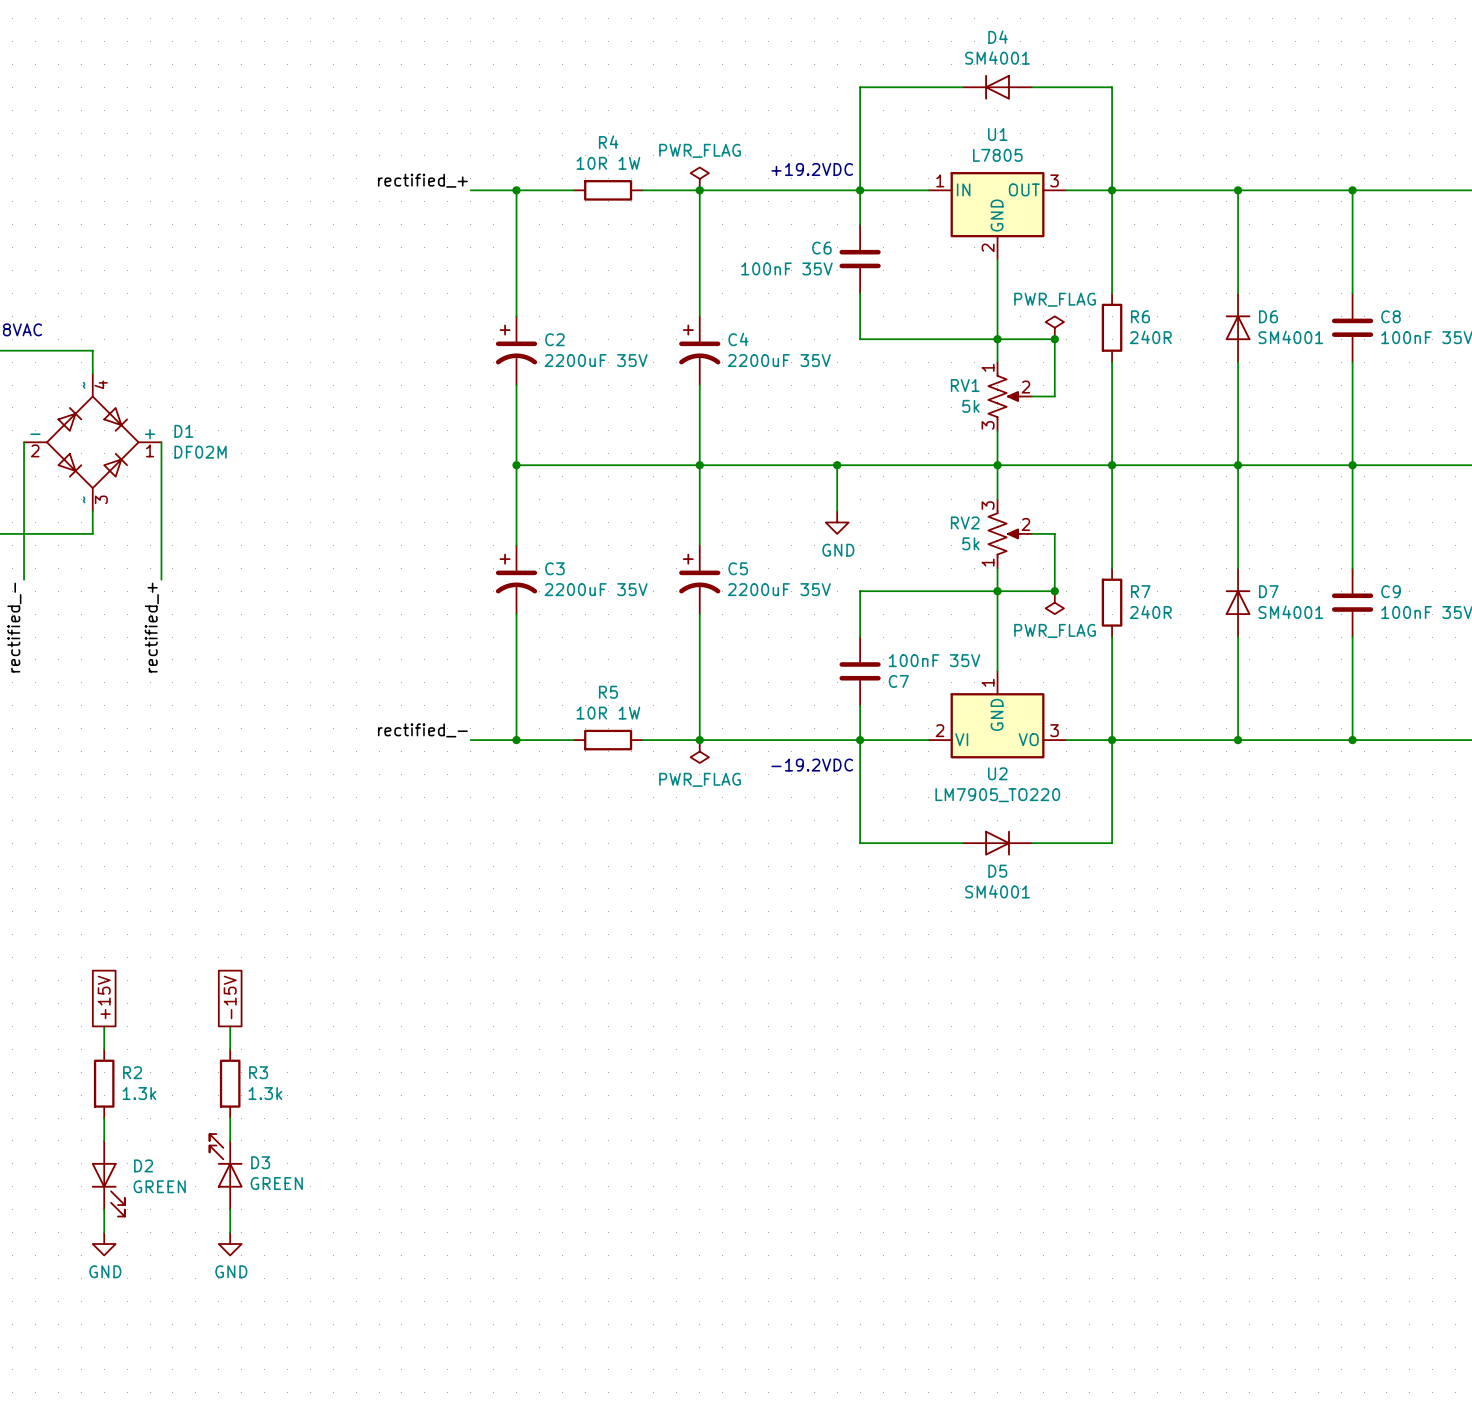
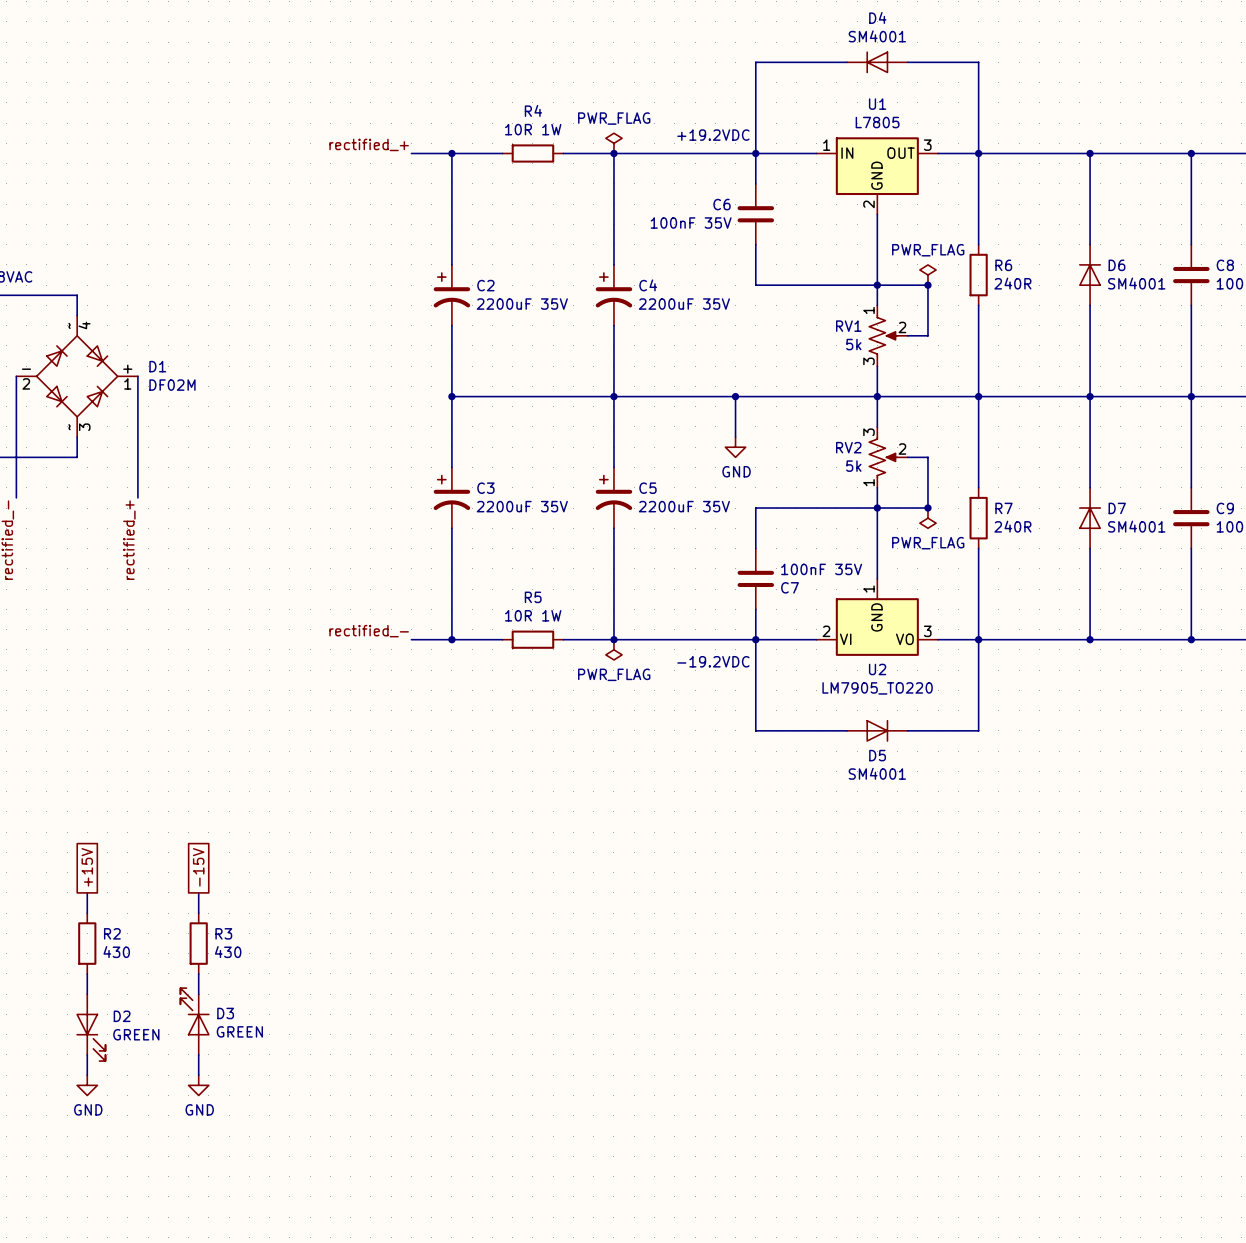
R2 value: 1.3k (139, 1093) -> 430 (116, 952)
R3 value: 1.3k (265, 1093) -> 430 (228, 952)

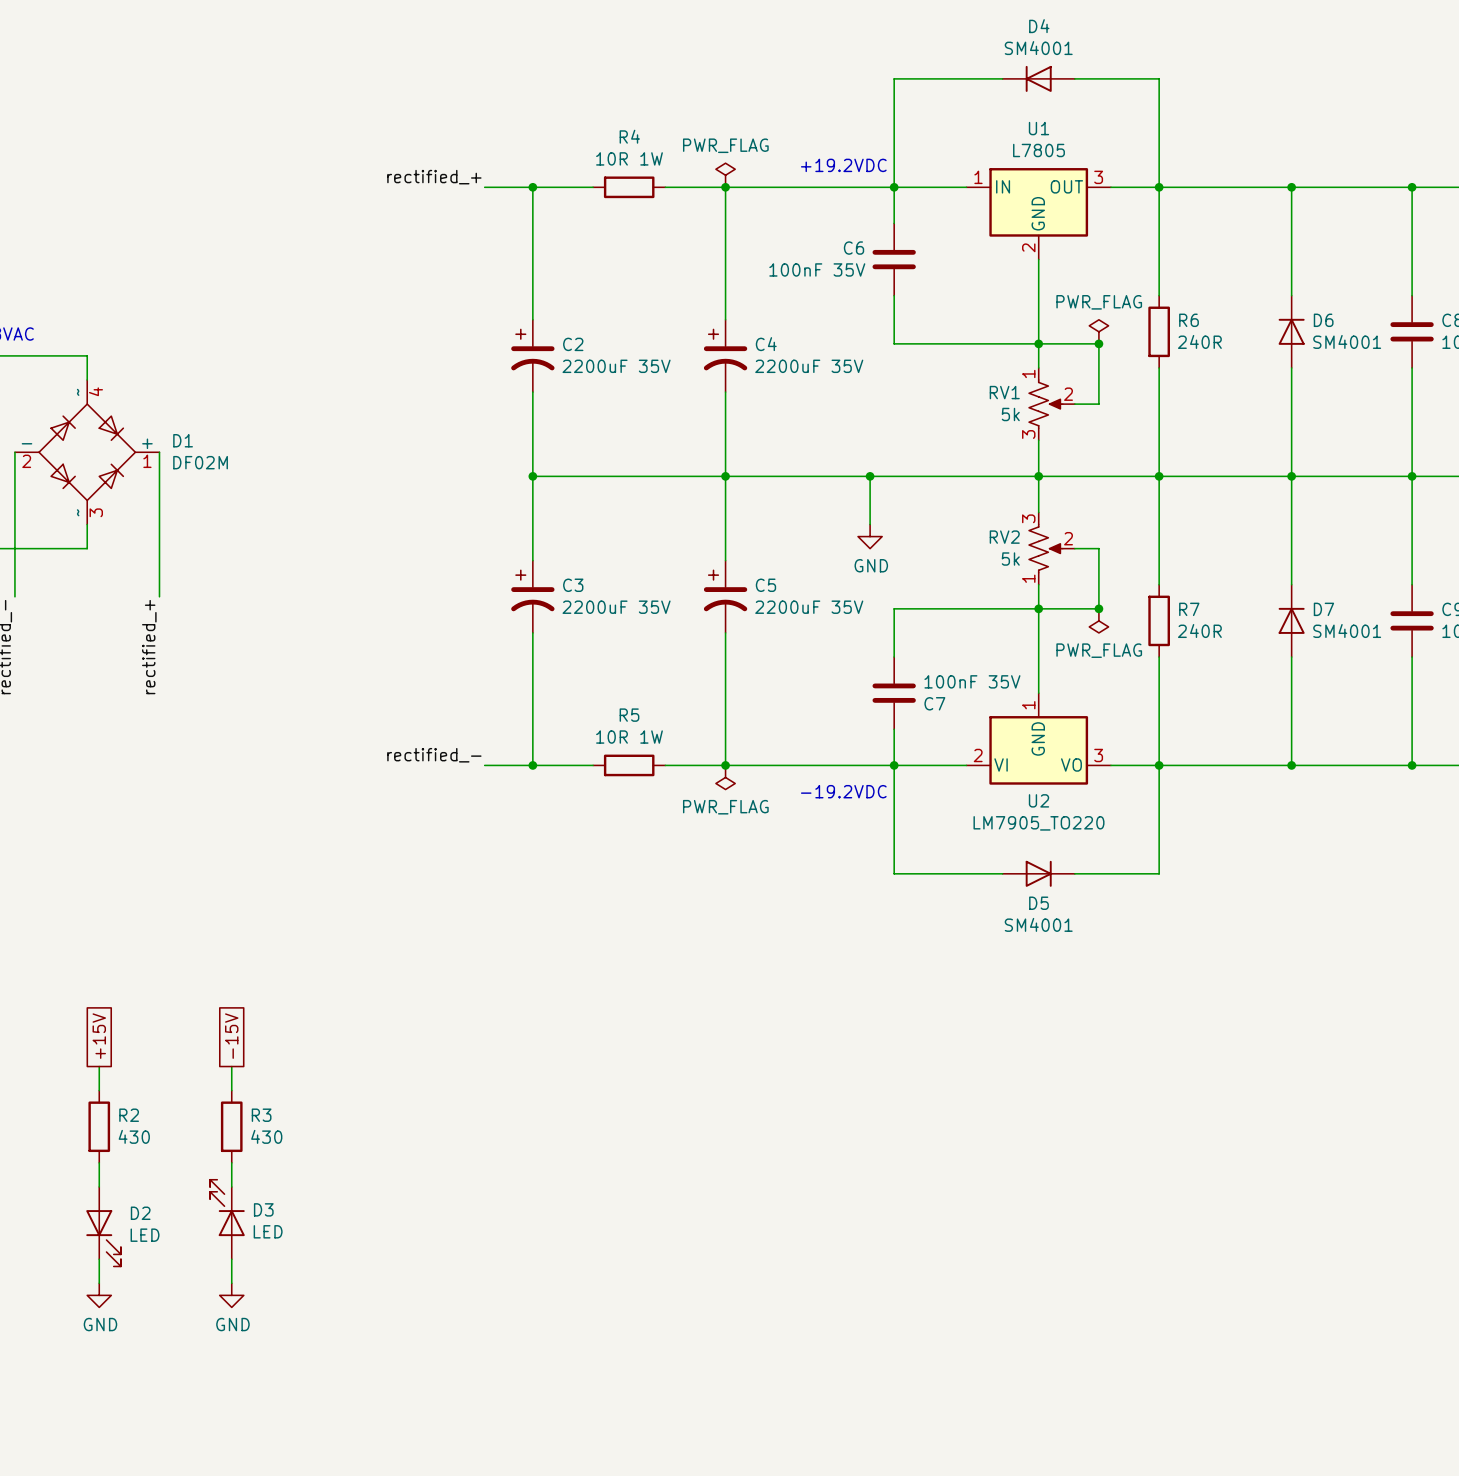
D3 value: GREEN (239, 1031) -> LED (268, 1231)
D2 value: GREEN (136, 1034) -> LED (145, 1235)

